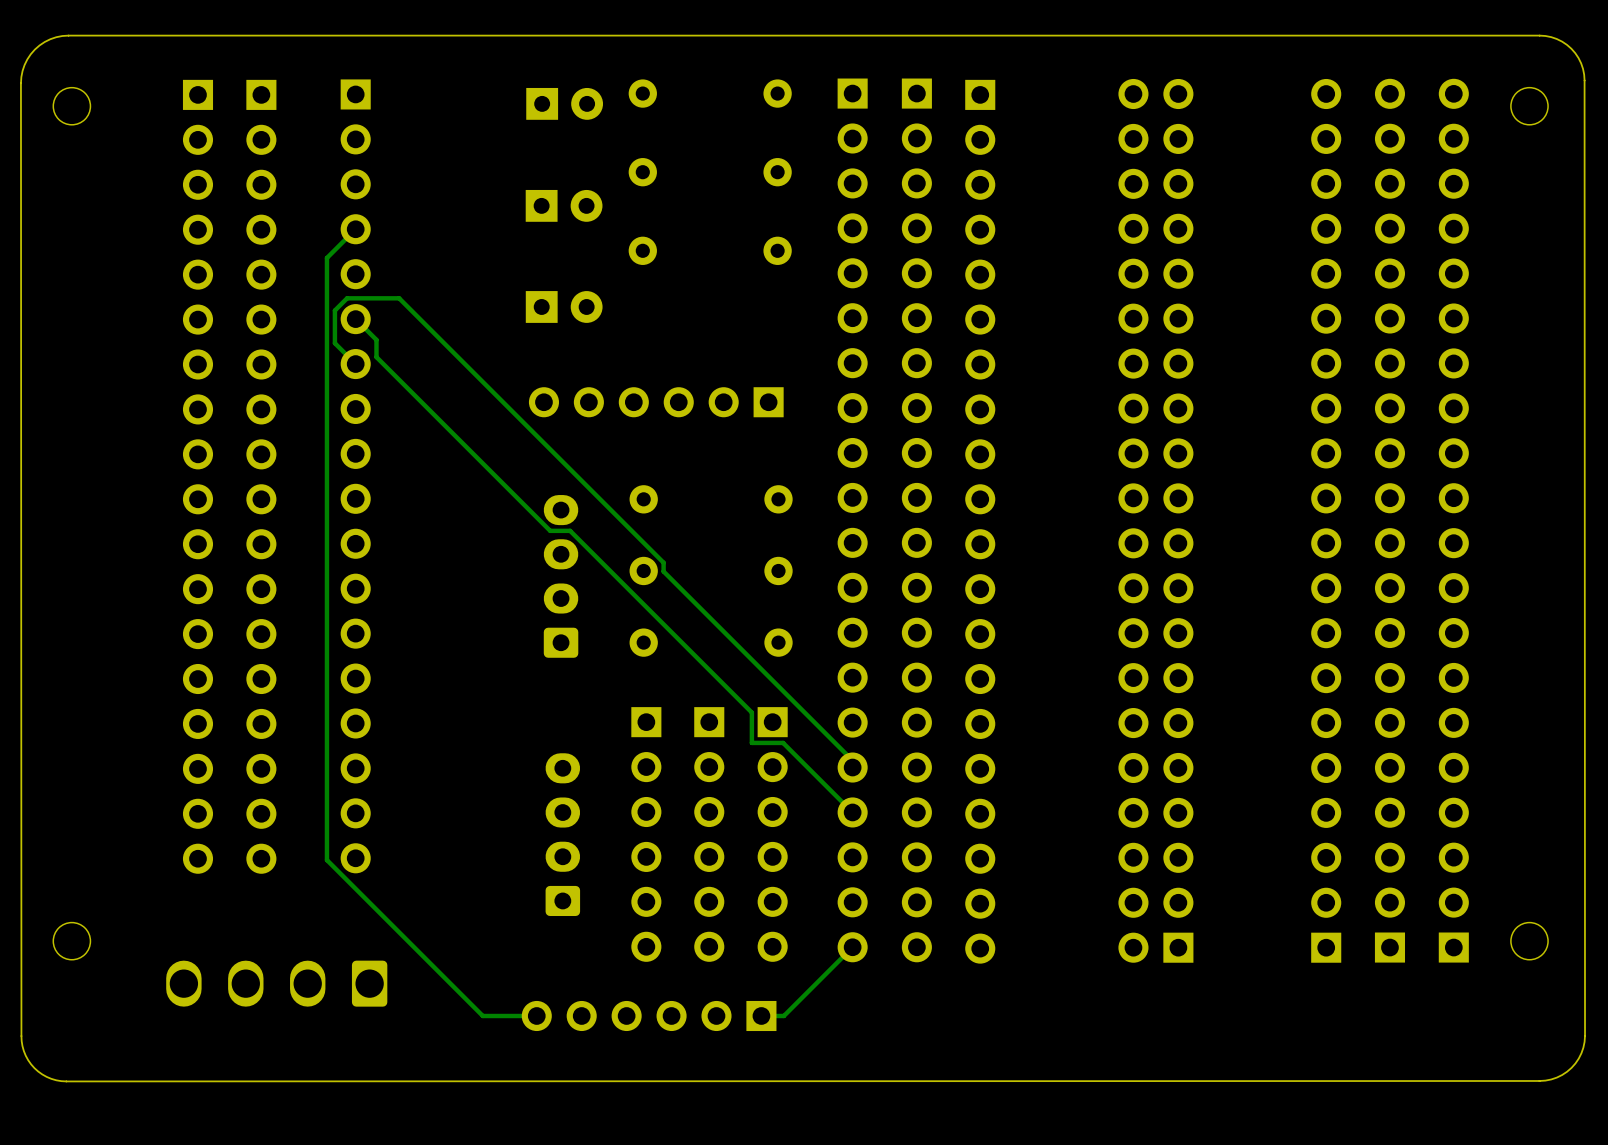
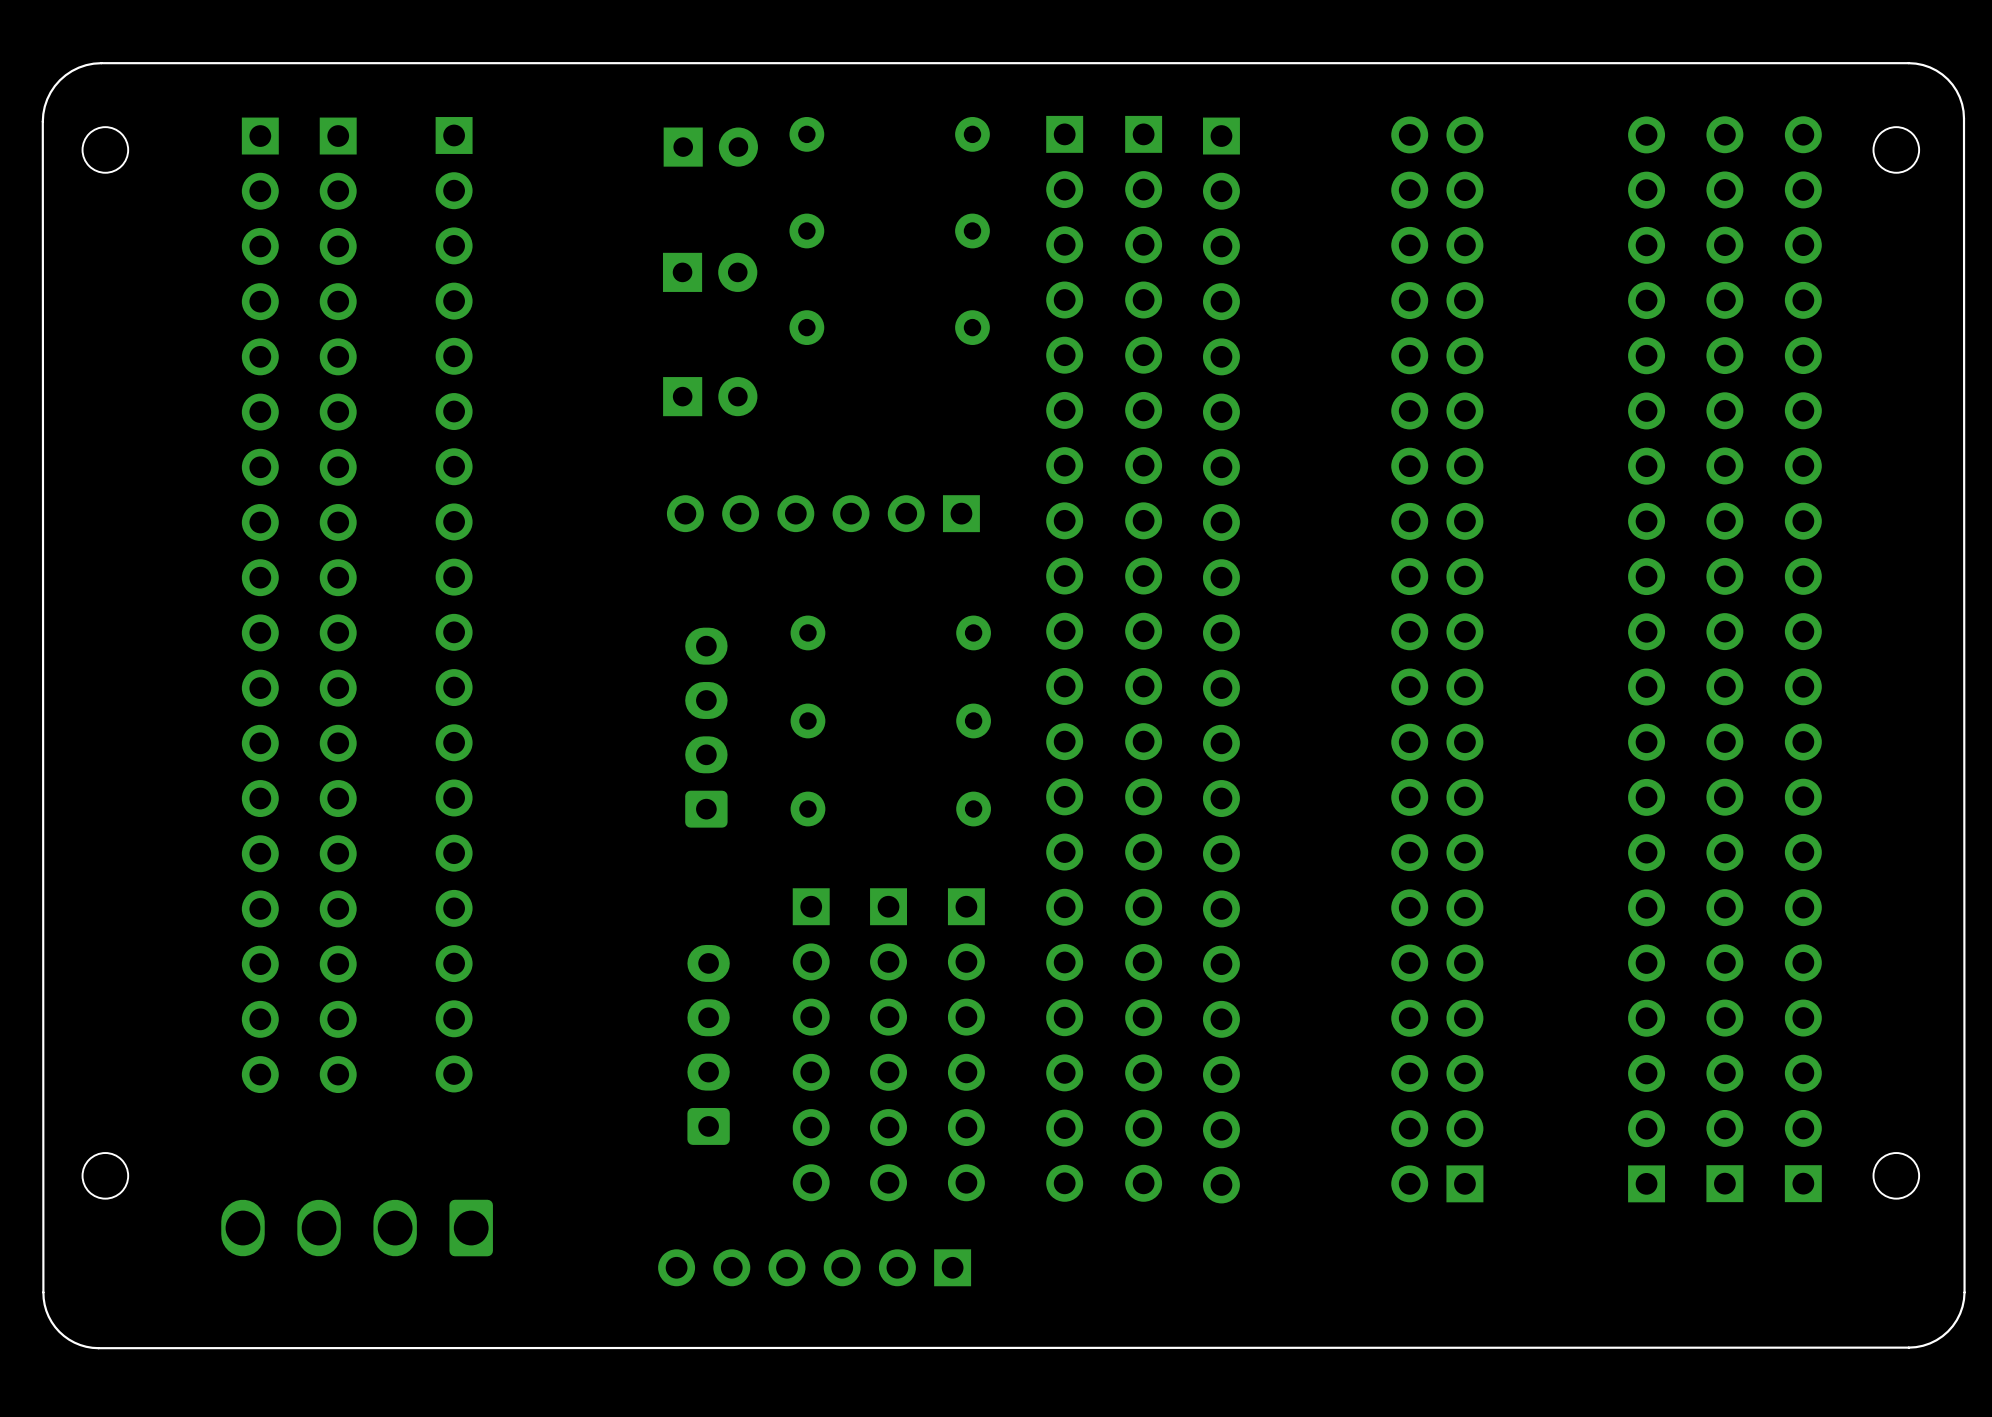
track: (355, 229) (326, 257) (326, 860) (482, 1015) (536, 1015) -> none
track: (355, 319) (376, 339) (376, 357) (550, 530) (570, 530) (751, 712) (751, 742) (783, 742) (852, 812) -> none
track: (355, 364) (334, 343) (334, 310) (347, 298) (399, 298) (663, 562) (663, 571) (852, 760) (852, 767) (856, 767) -> none
track: (852, 947) (783, 1015) (761, 1015) -> none

